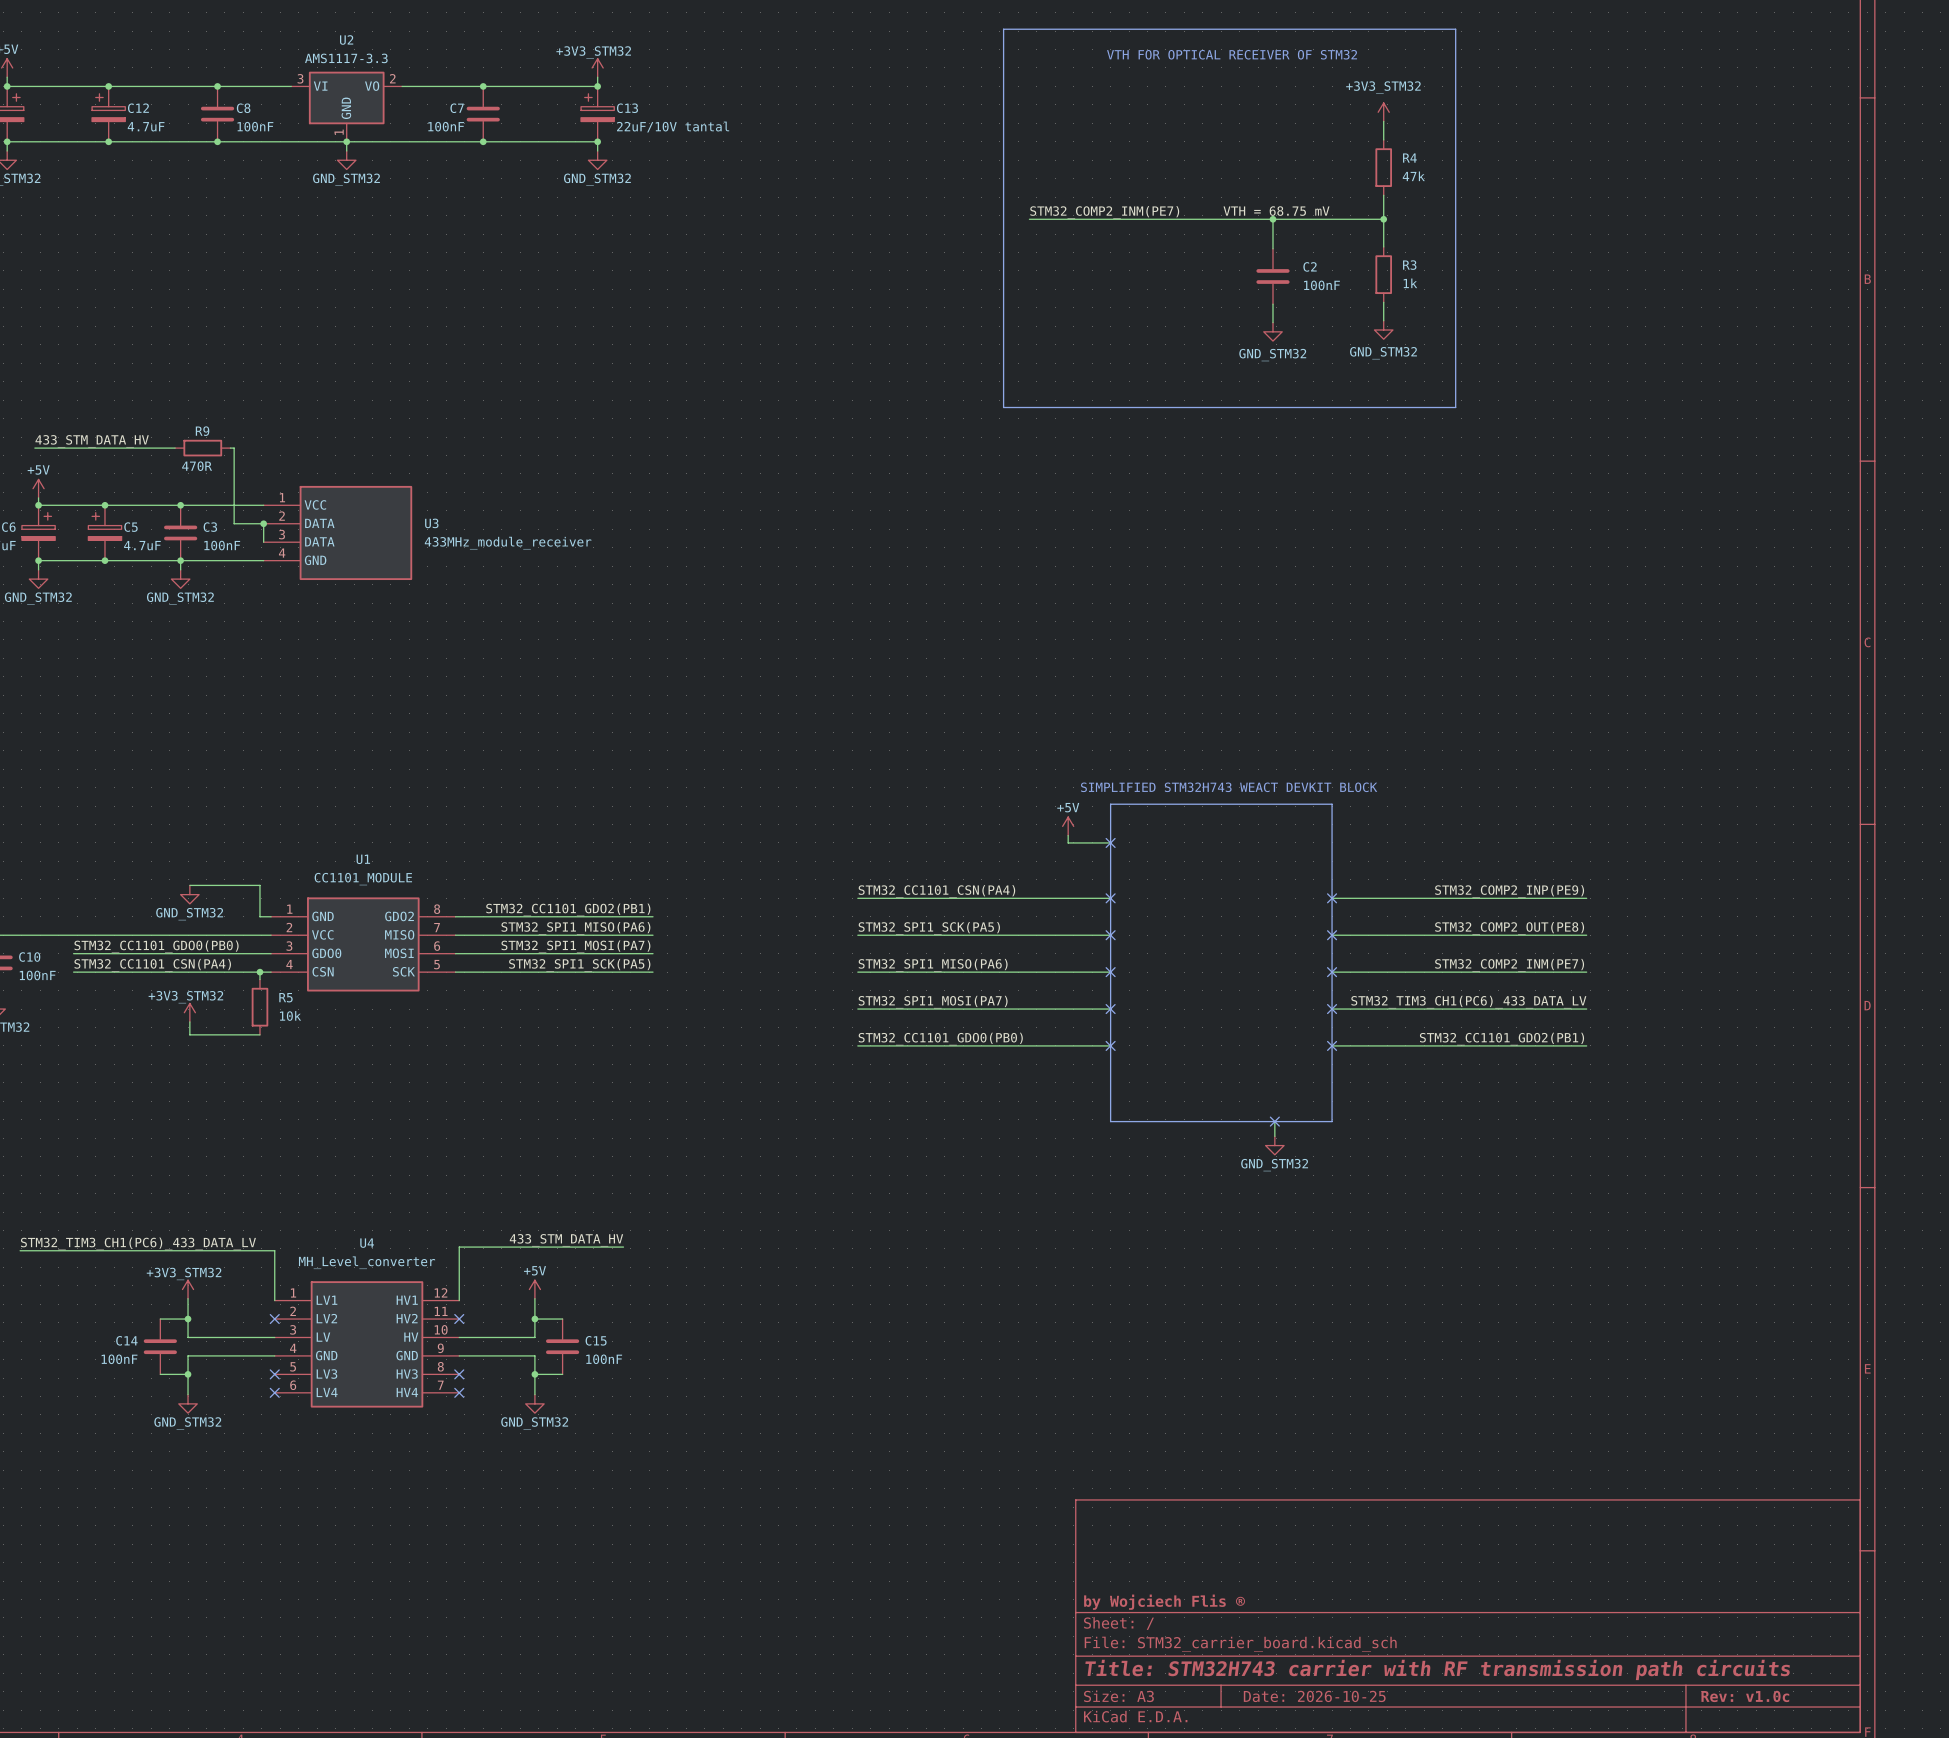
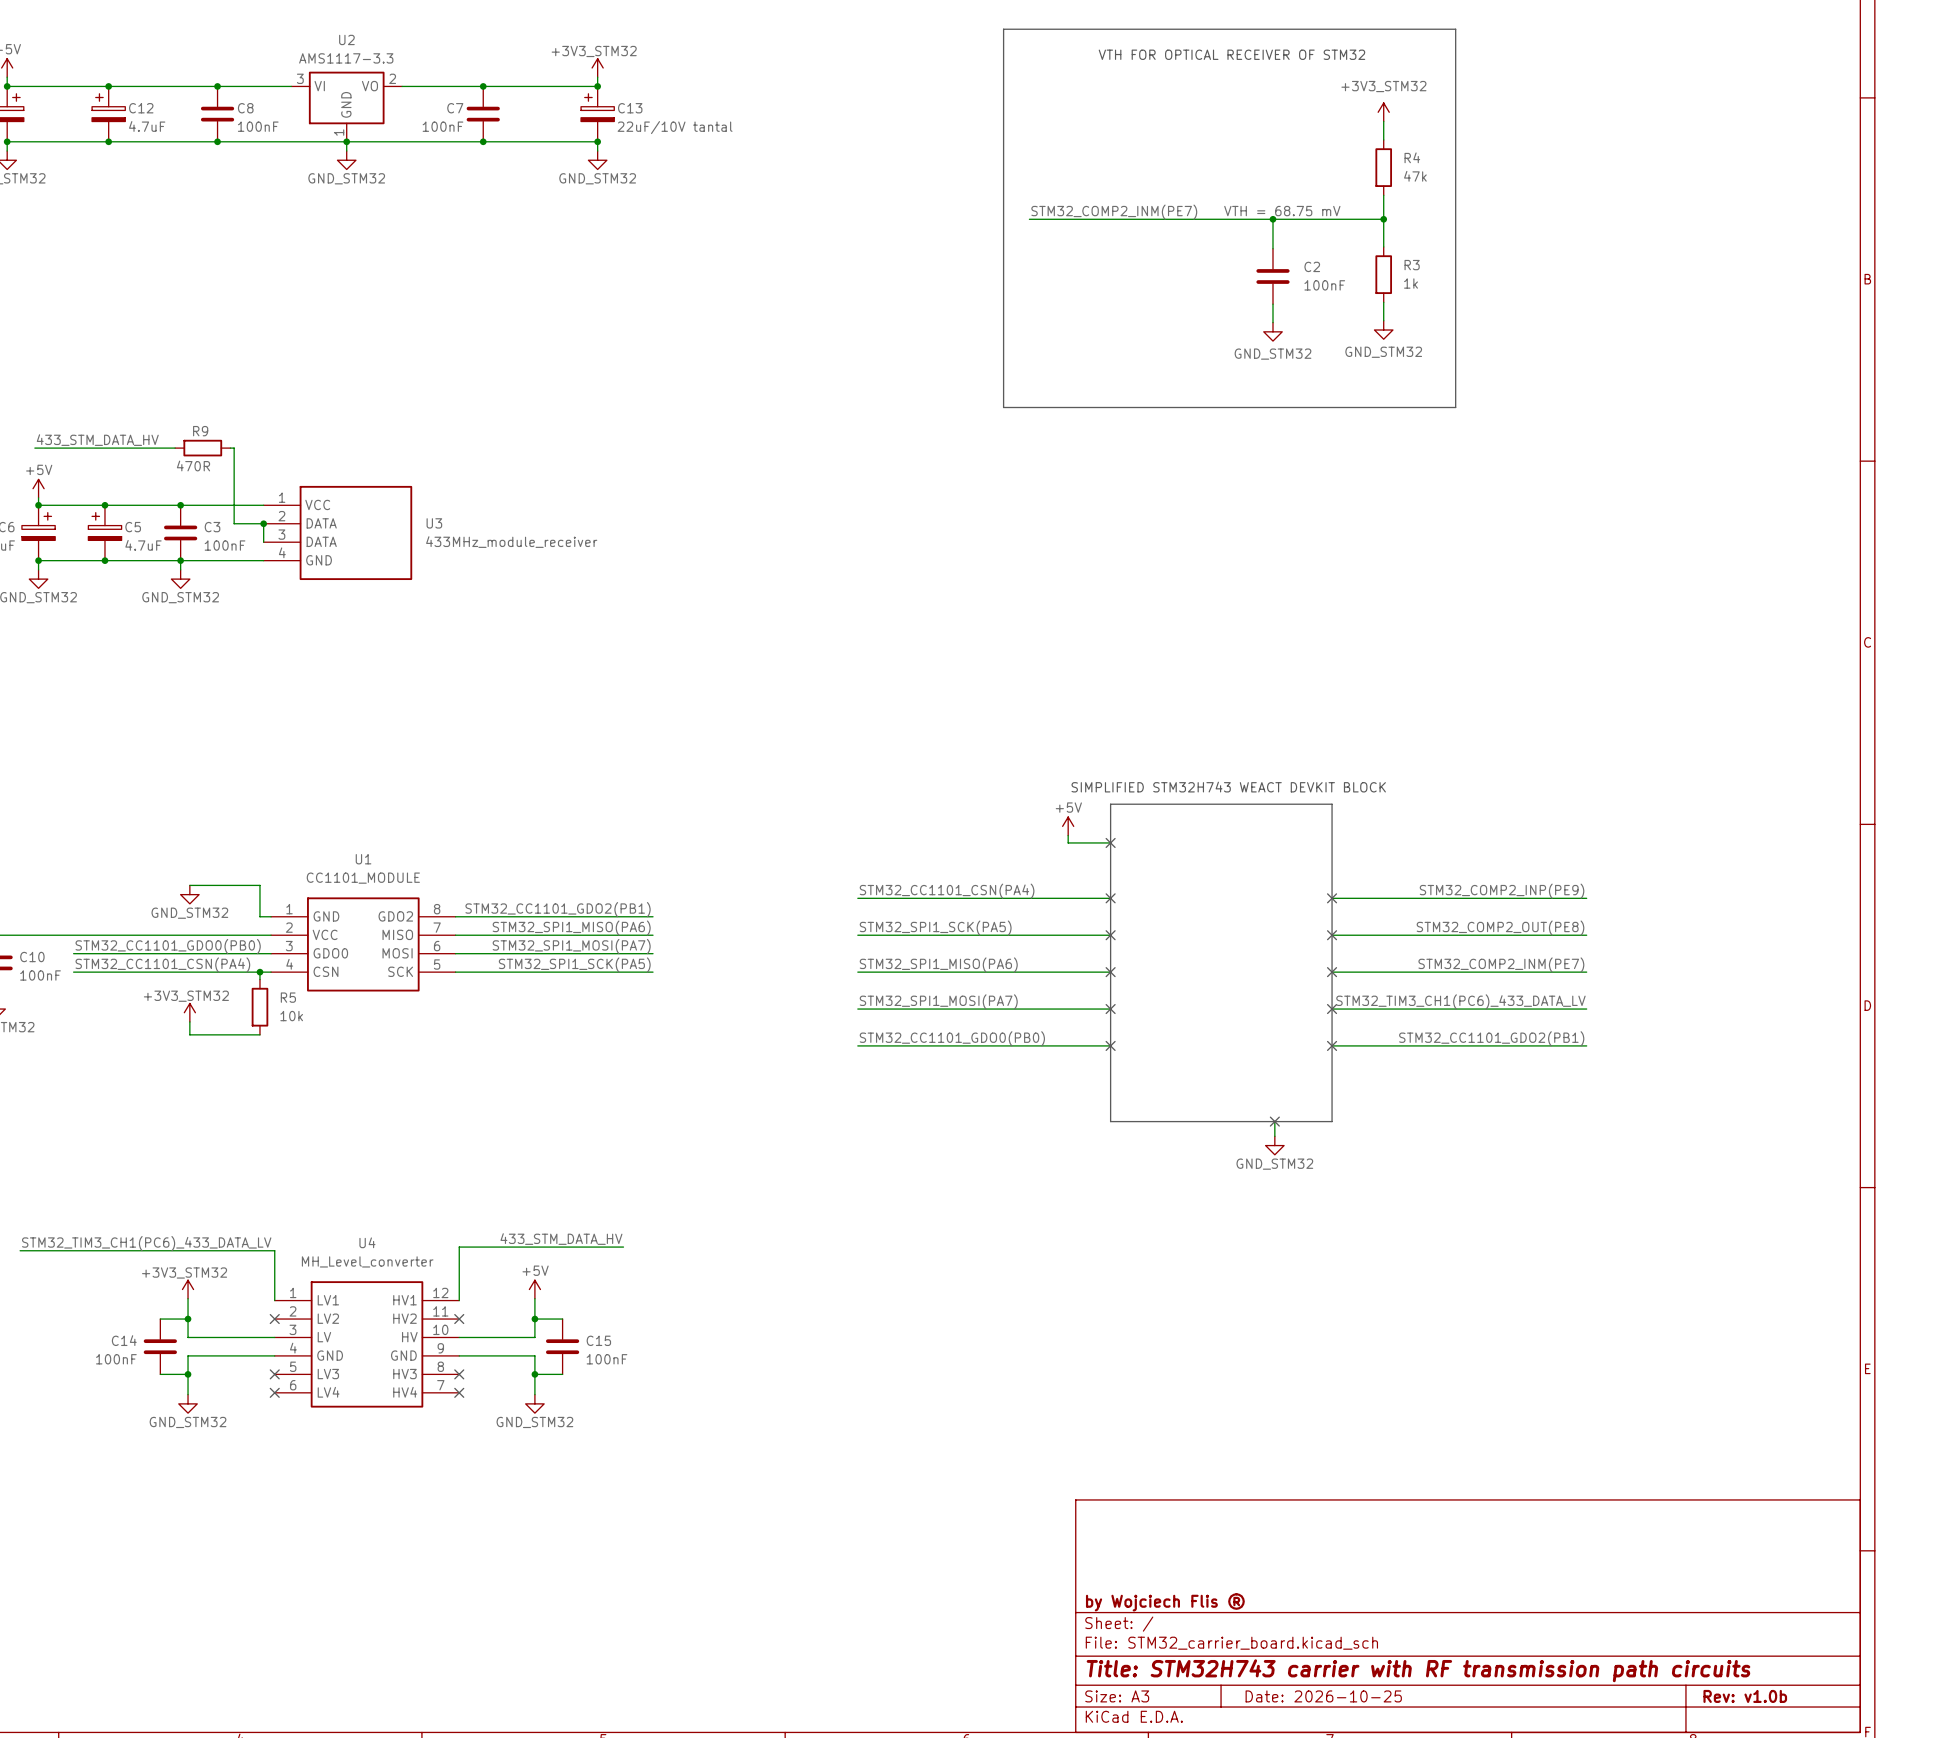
title block: Rev: v1.0c (1745, 1696) -> Rev: v1.0b (1745, 1696)

